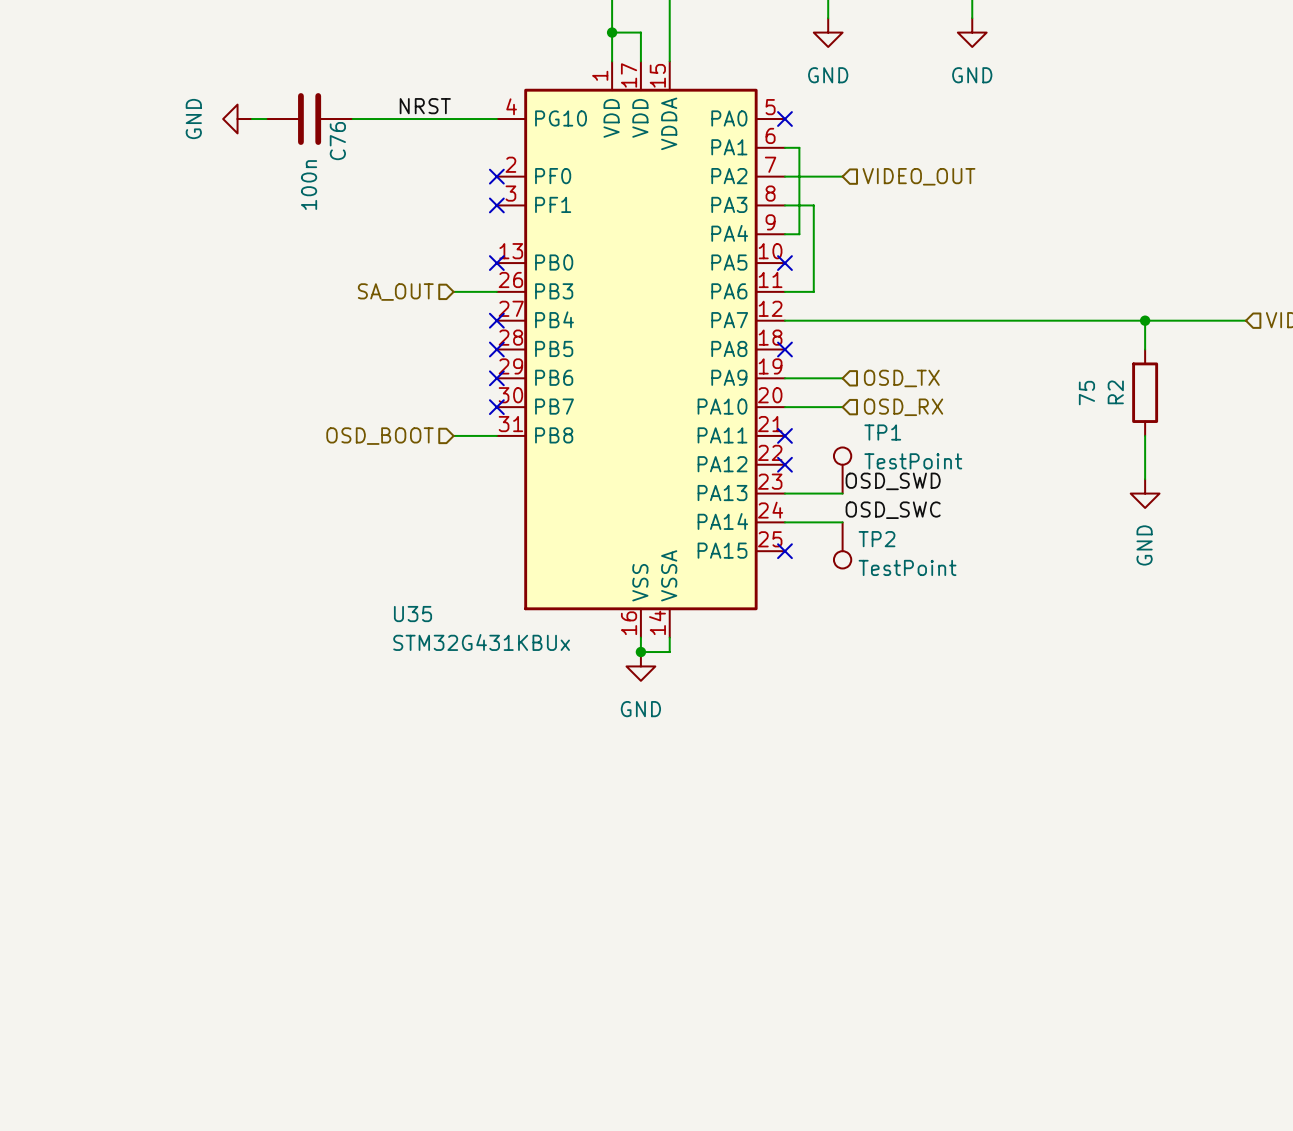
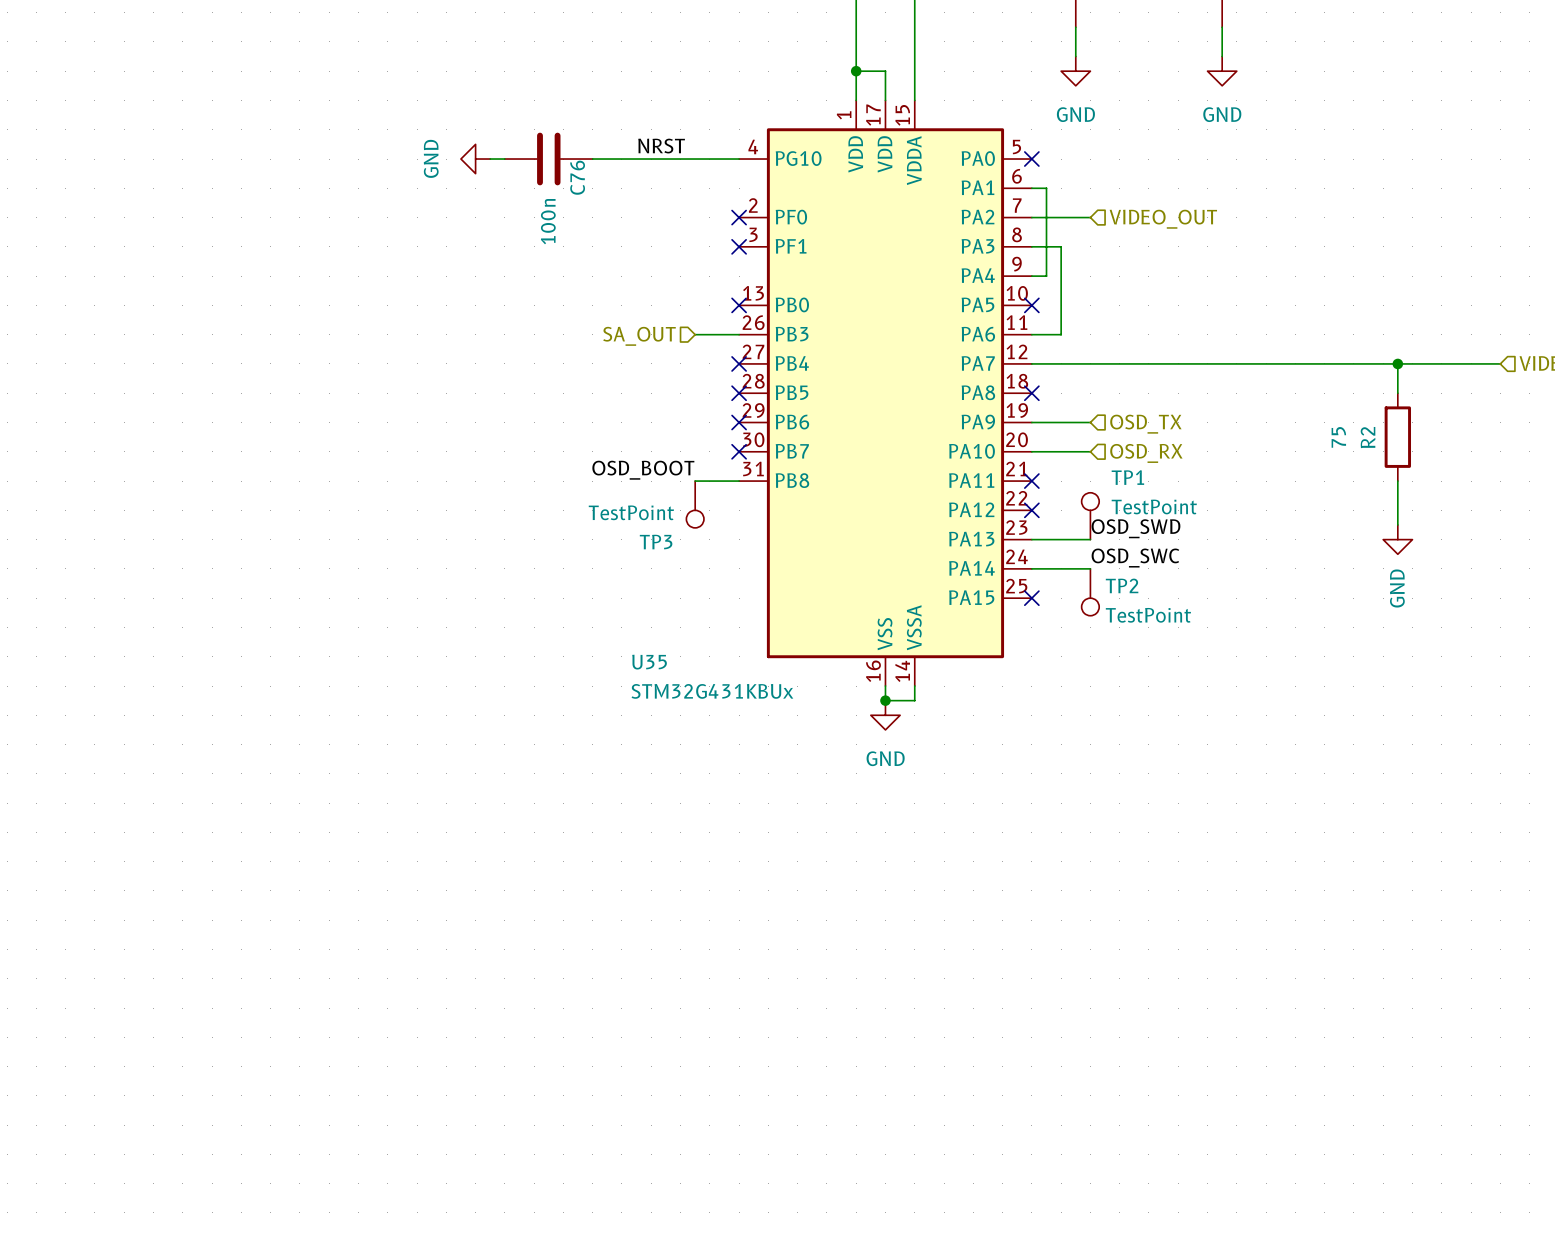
label: none -> OSD_BOOT (643, 470)
hierarchical label: OSD_BOOT (380, 436) -> none
TP3: none -> TestPoint (695, 504)

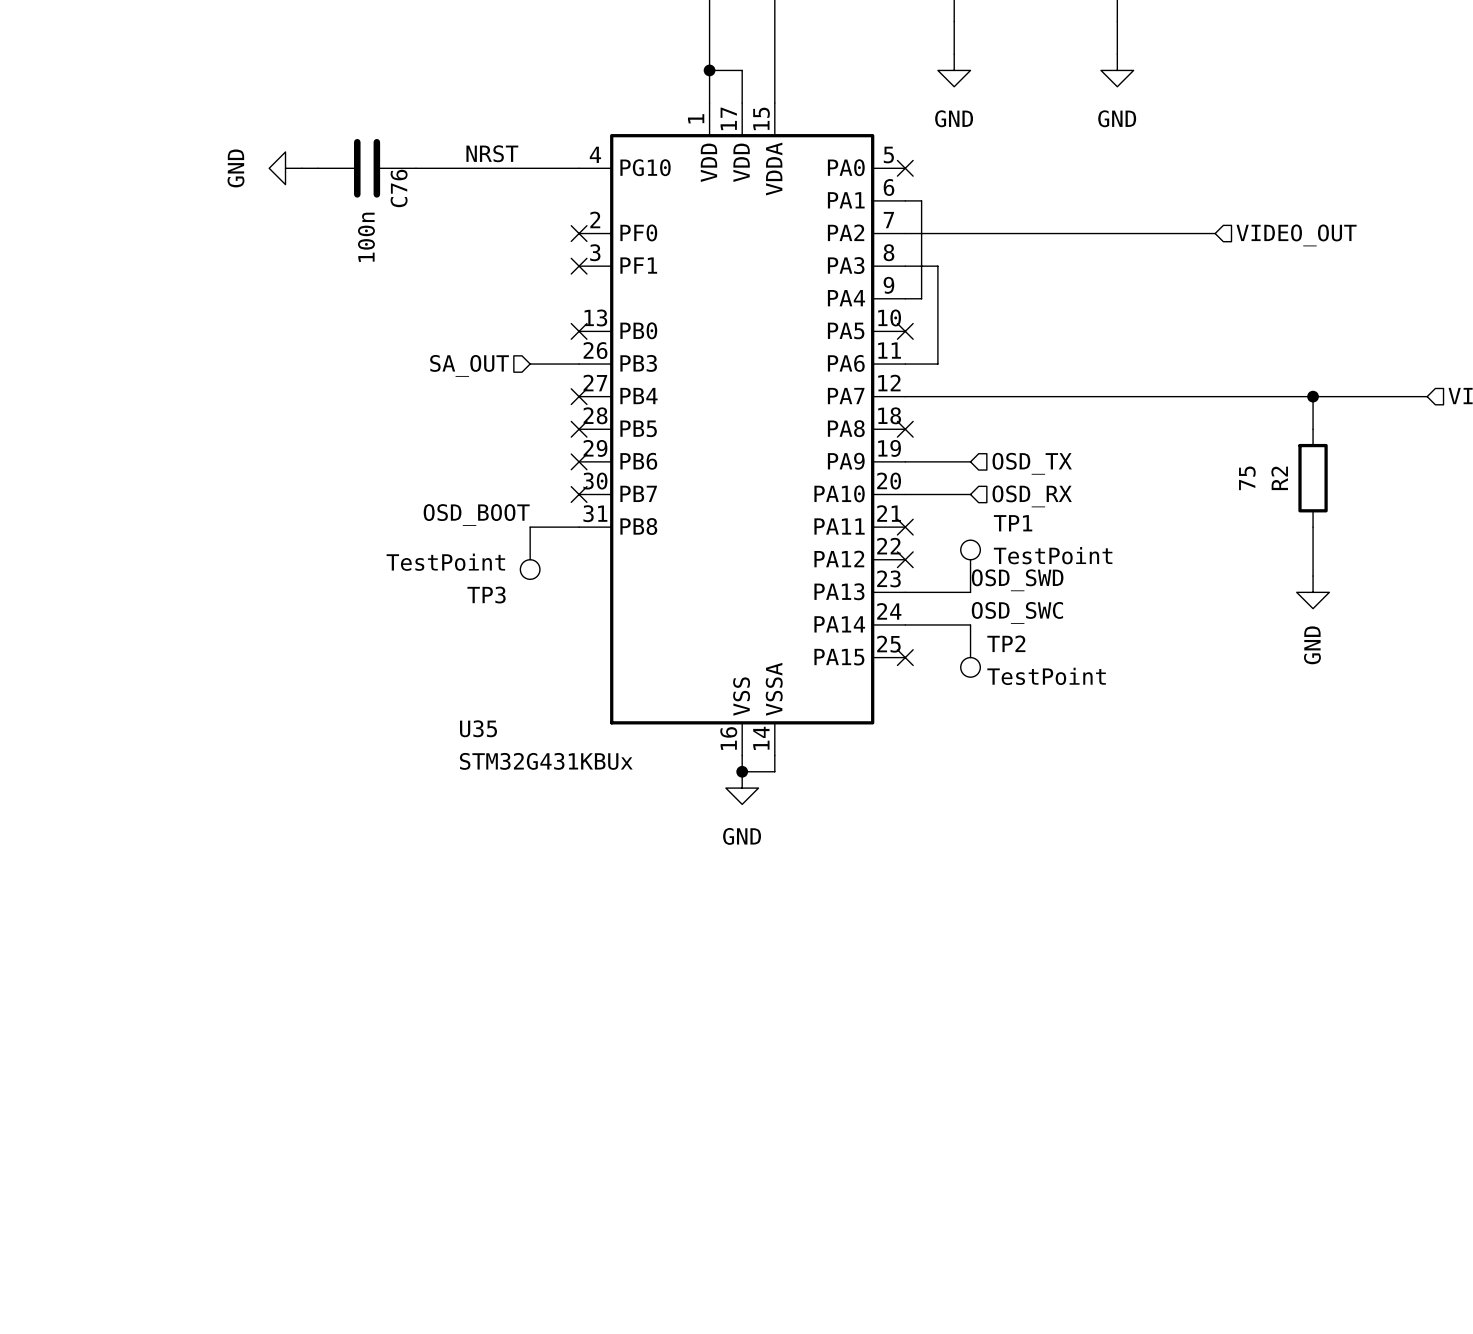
wire: none -> (970, 233) (1215, 233)
hierarchical label position: VIDEO_OUT (1163, 219) -> VIDEO_OUT (1296, 235)

